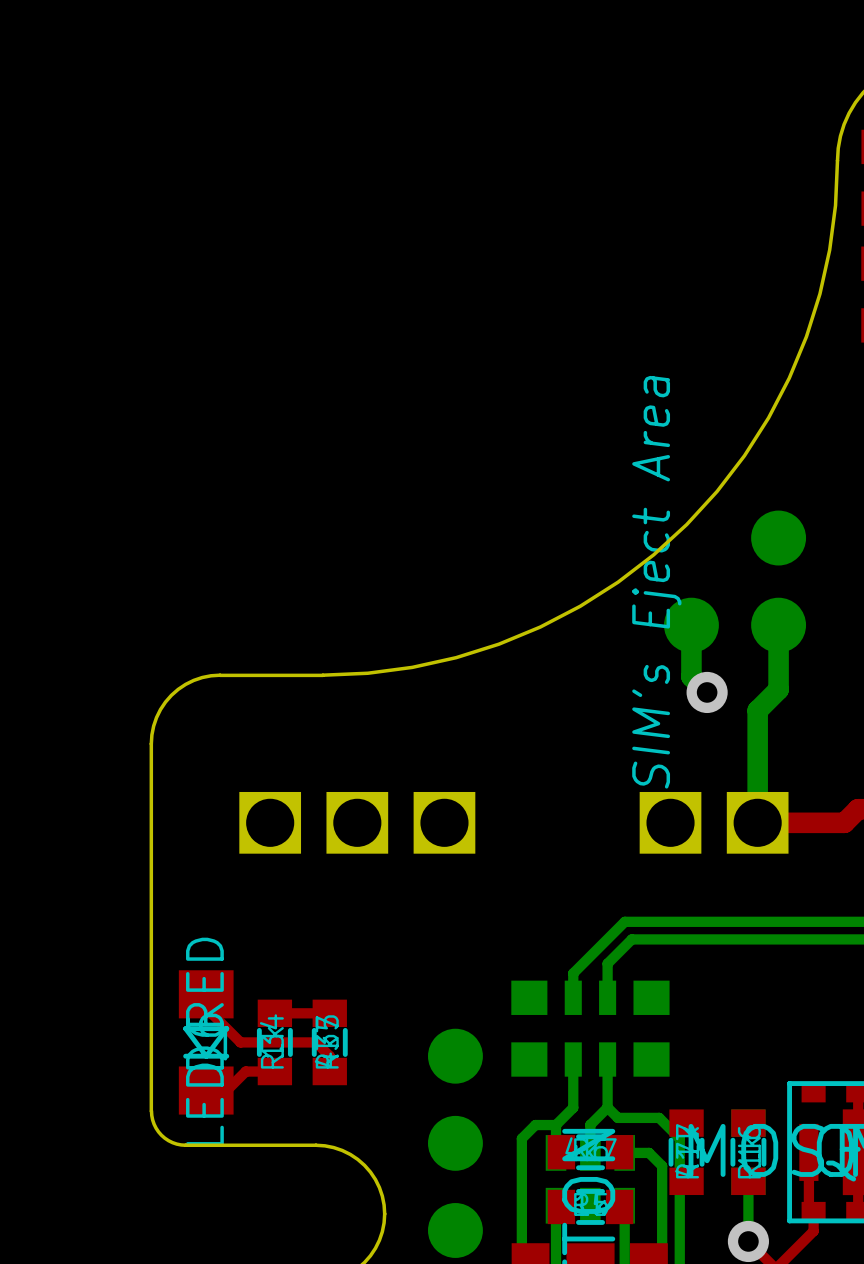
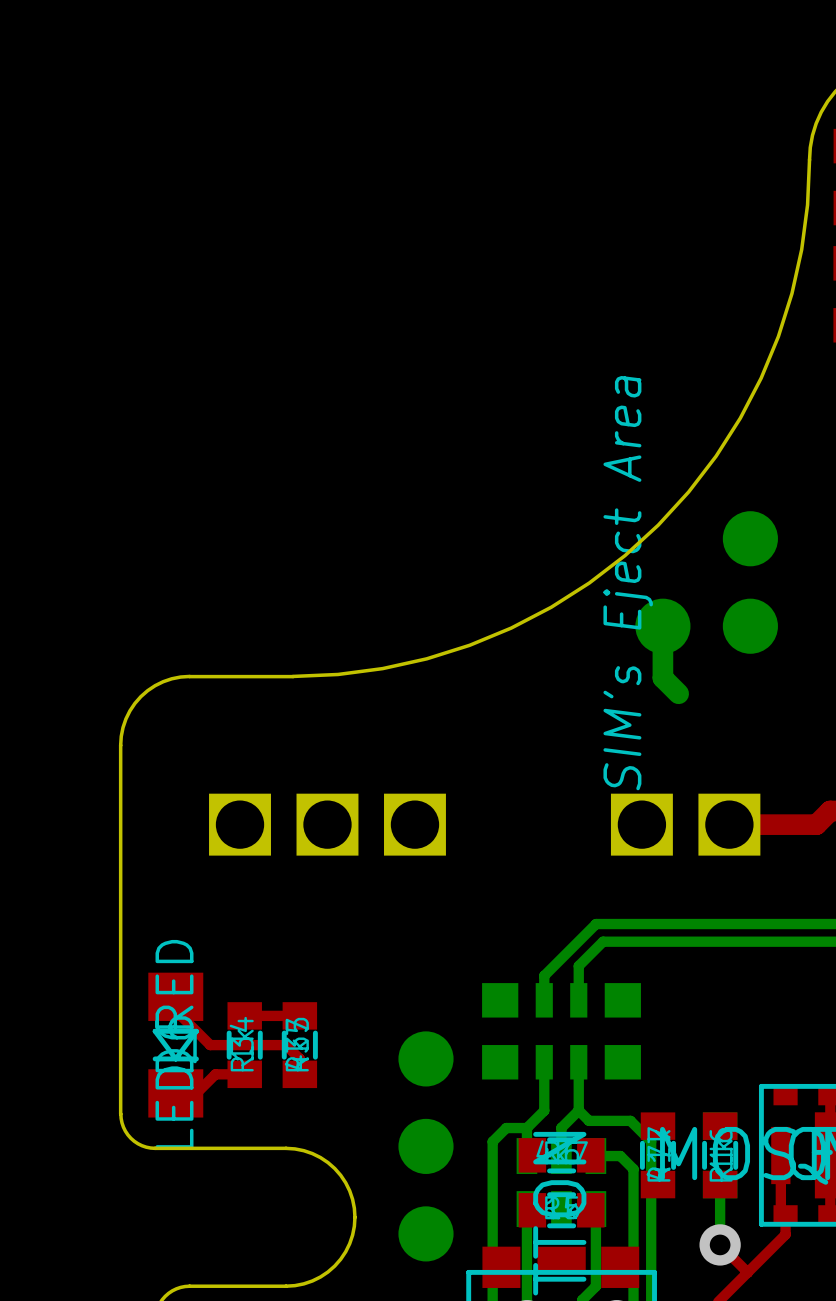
bottom track: (778, 625) (778, 689) (757, 710) (757, 822) -> none
via: (707, 692) -> none

